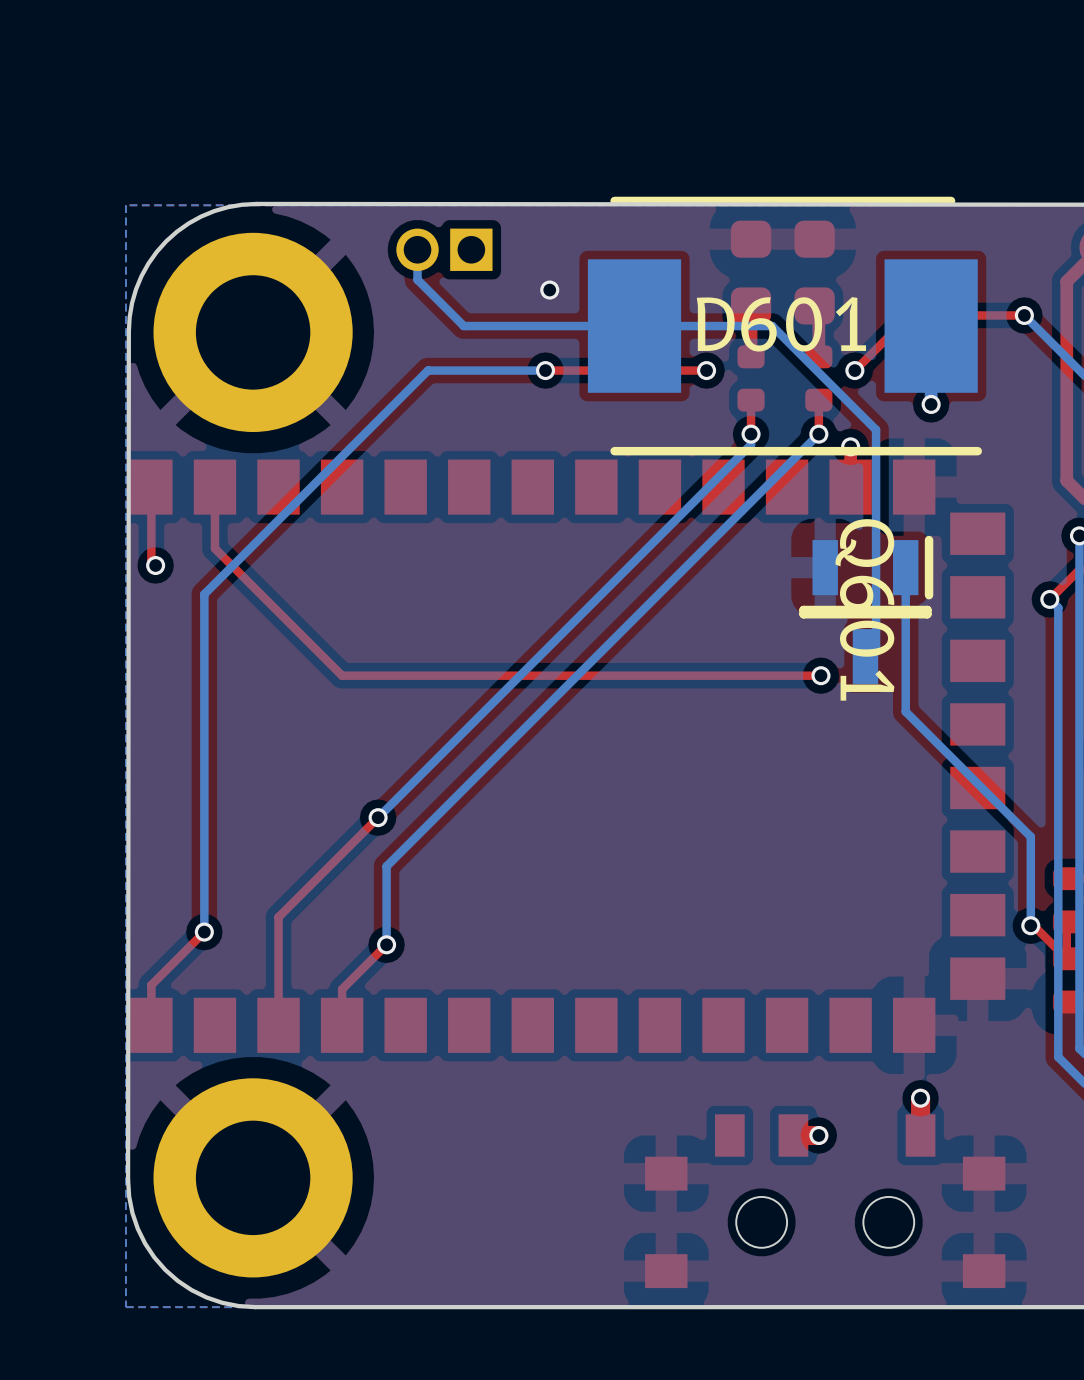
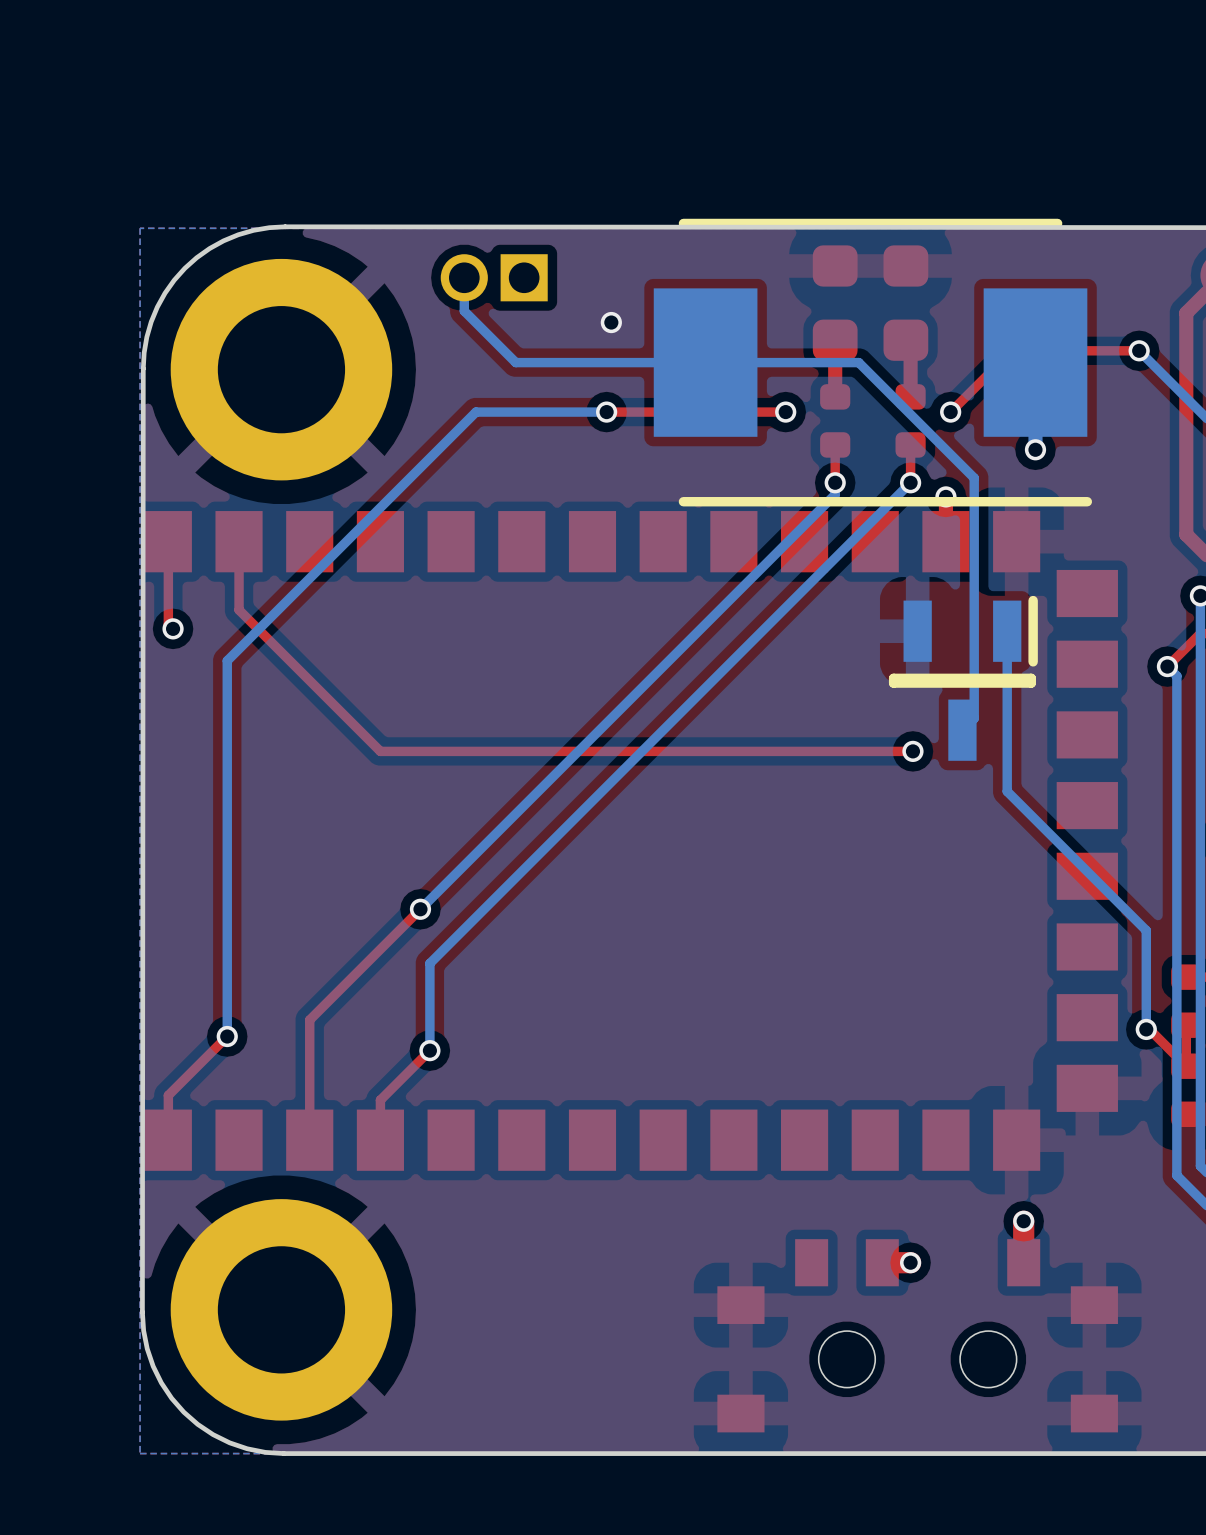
D601 name: D601 (781, 324) -> none
Q601 name: Q601 (864, 609) -> none

